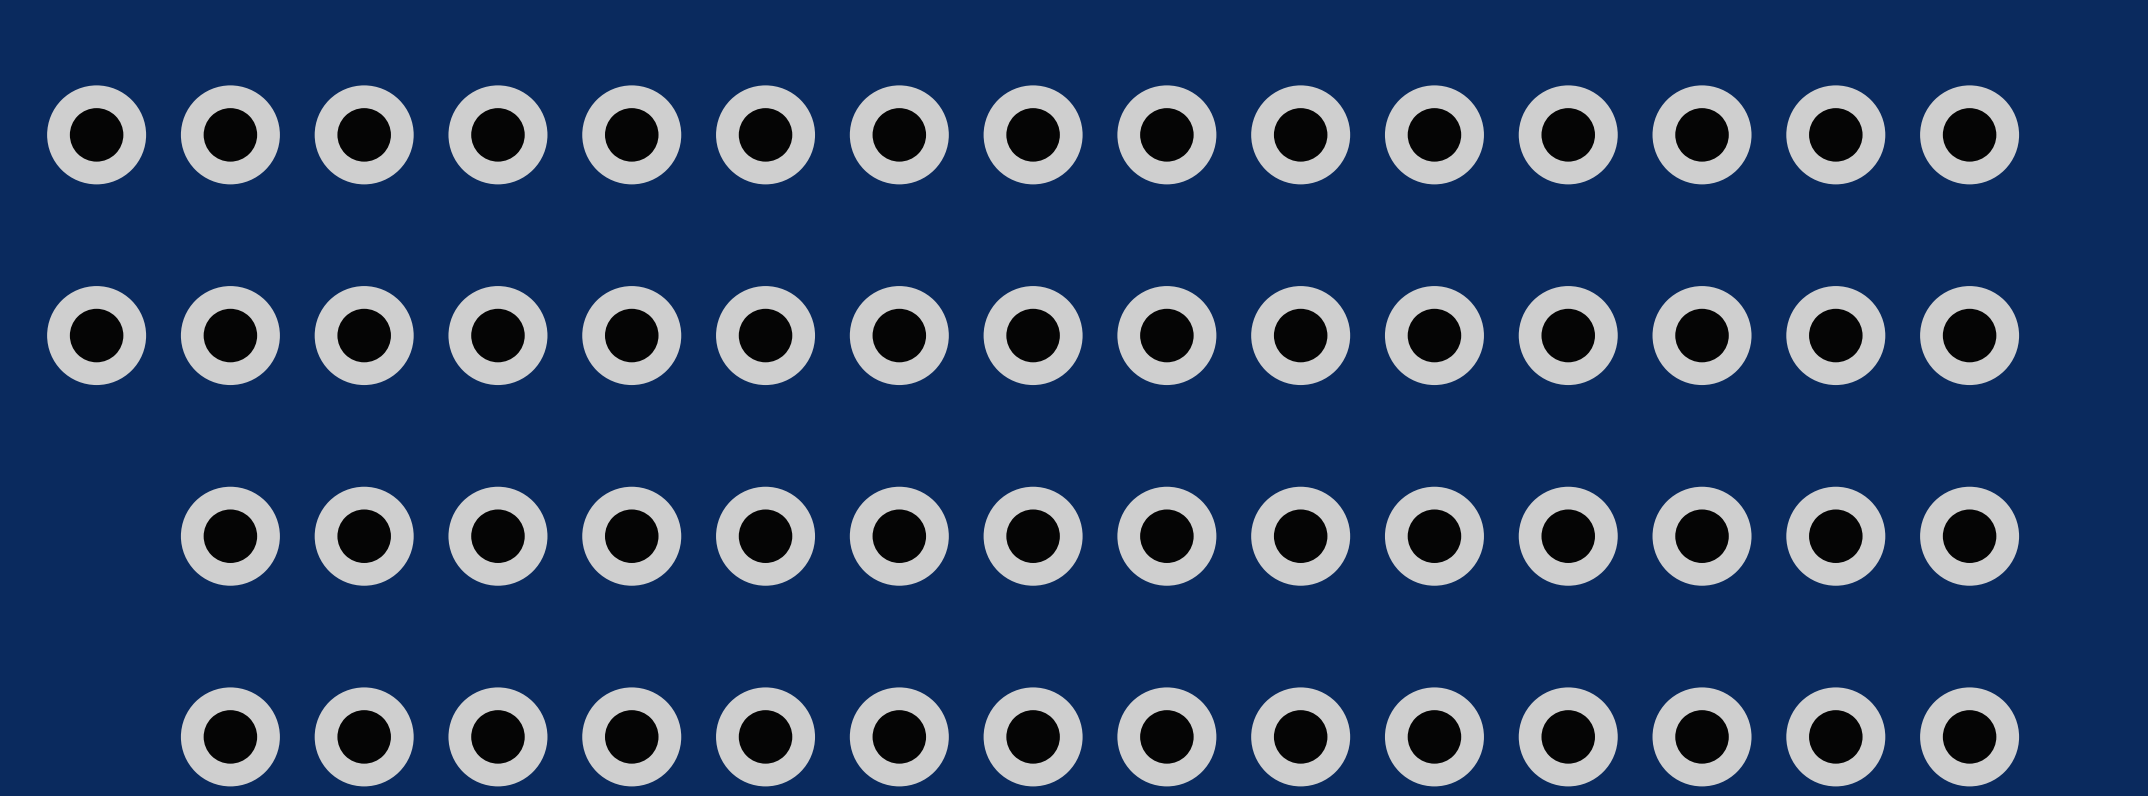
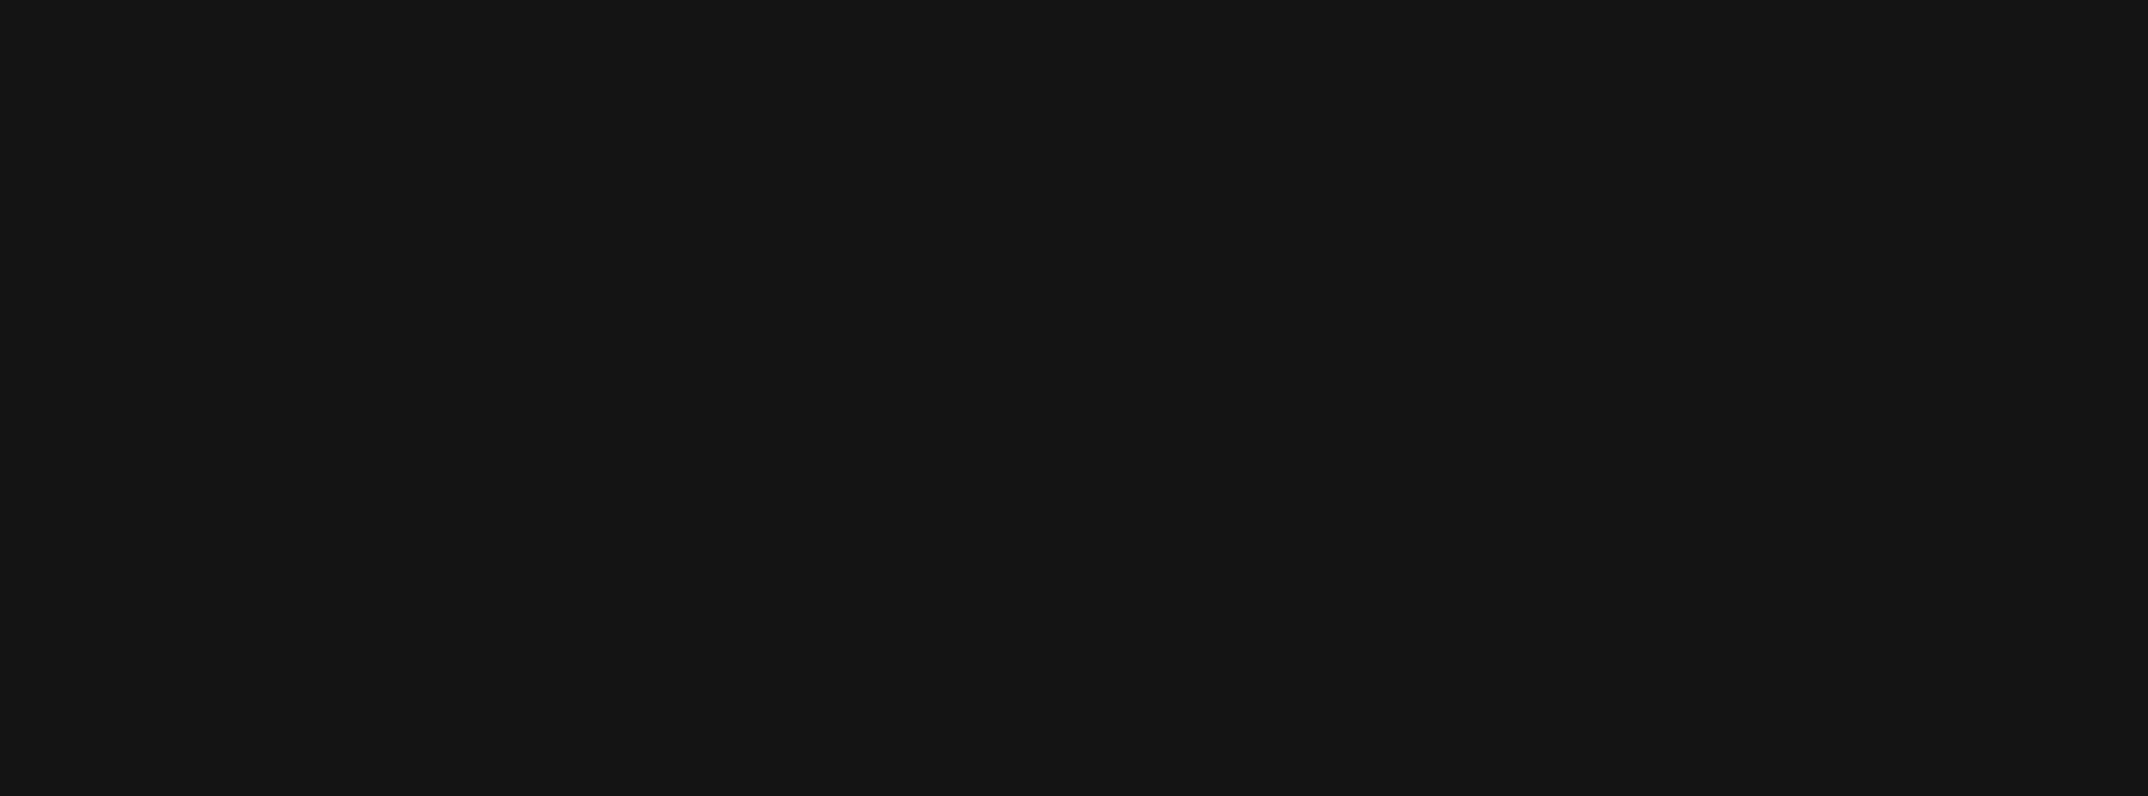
part: (1033, 134) -> none
part: (1033, 335) -> none
part: (1099, 536) -> none
part: (1099, 736) -> none

